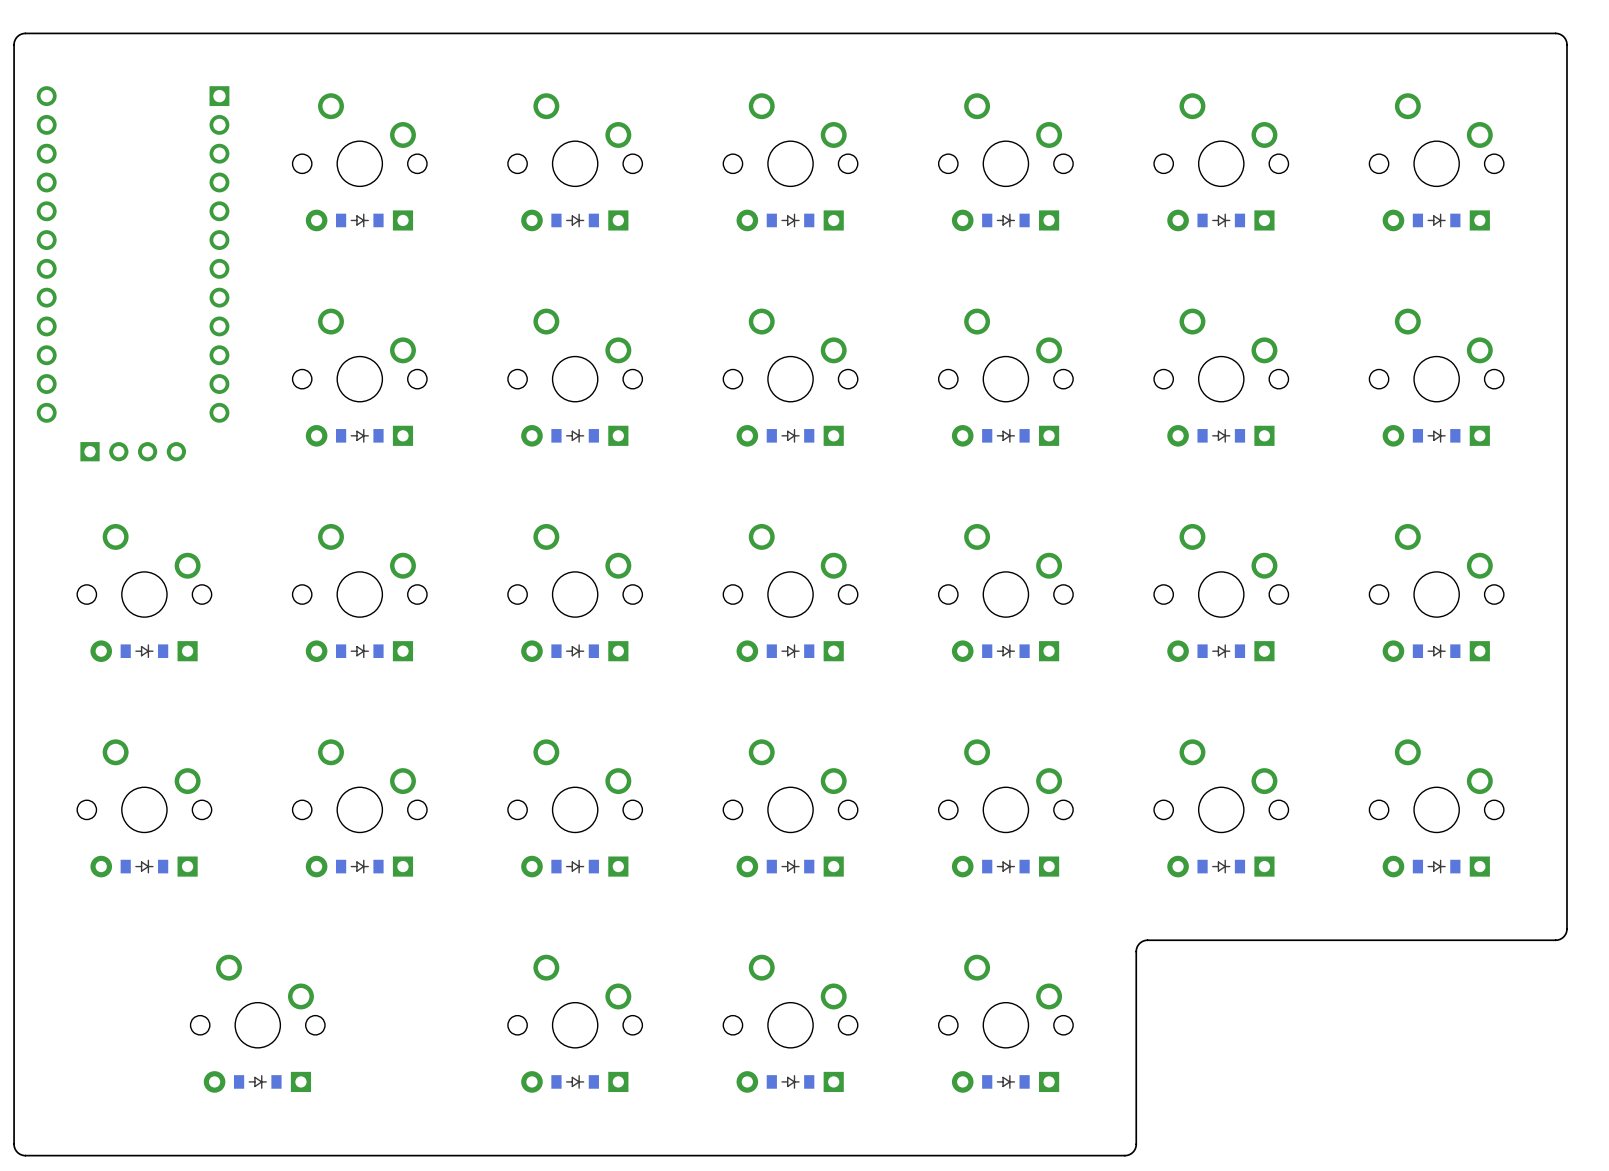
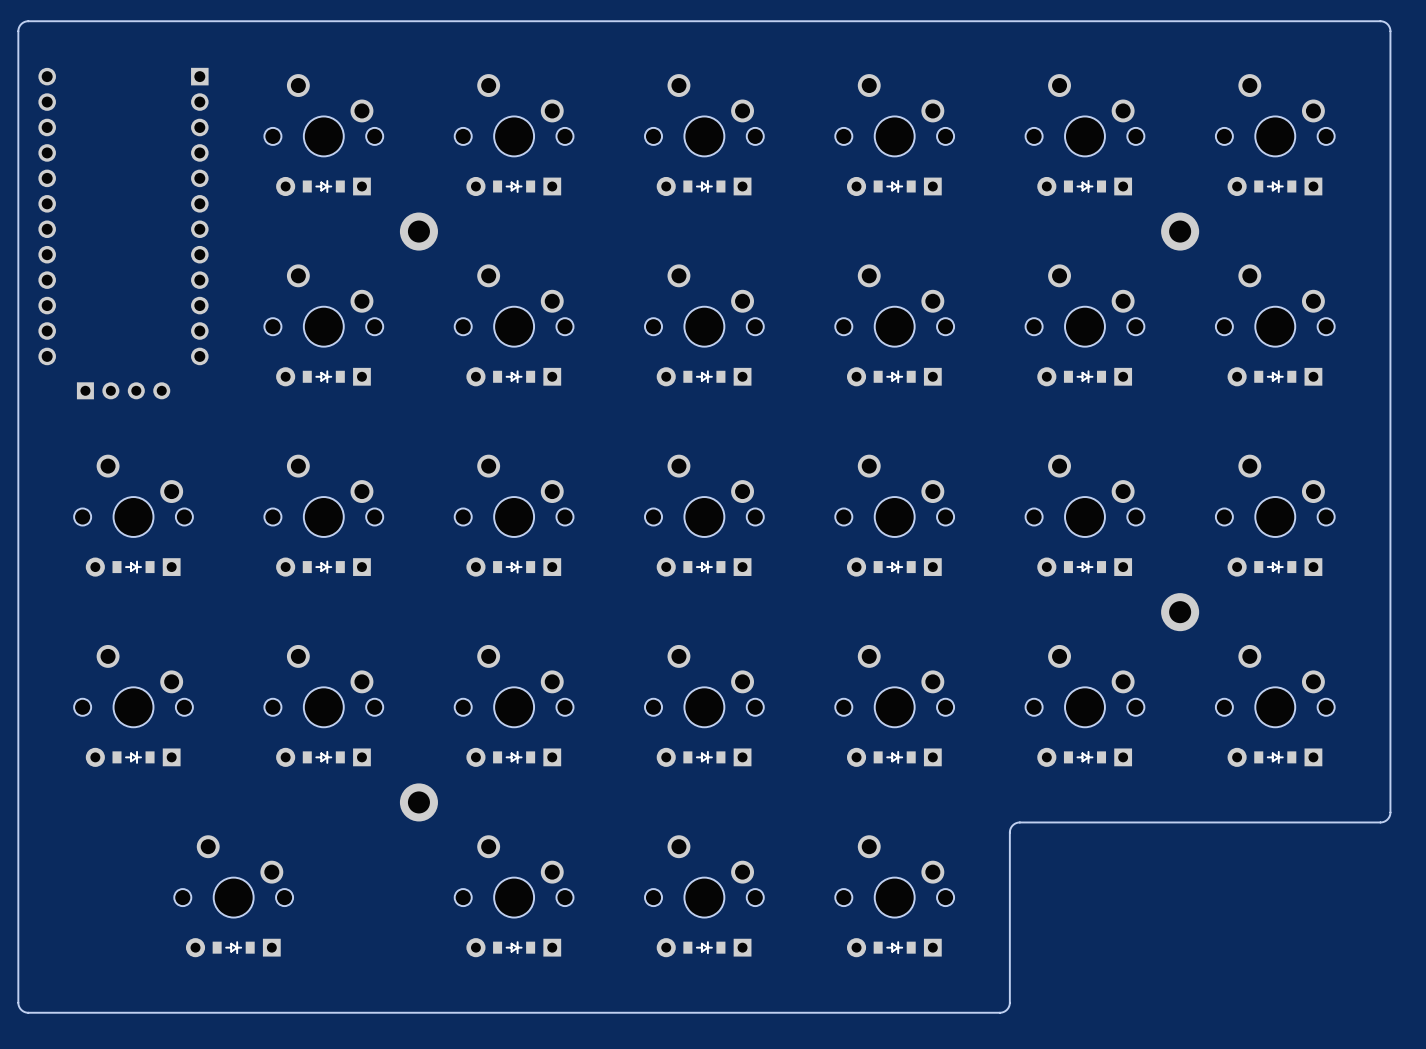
part: none -> (418, 231)
part: none -> (1180, 231)
part: none -> (1180, 612)
part: none -> (418, 802)

